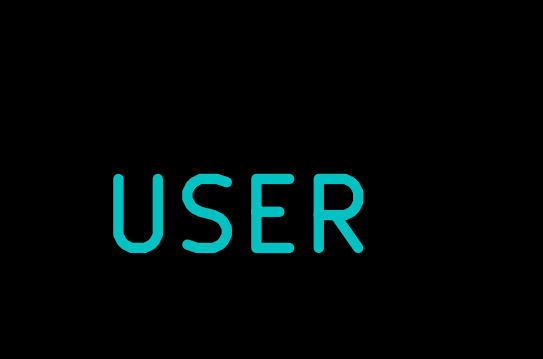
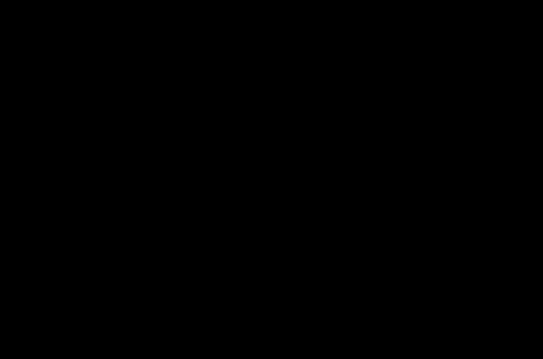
text: USER (238, 213) -> none

